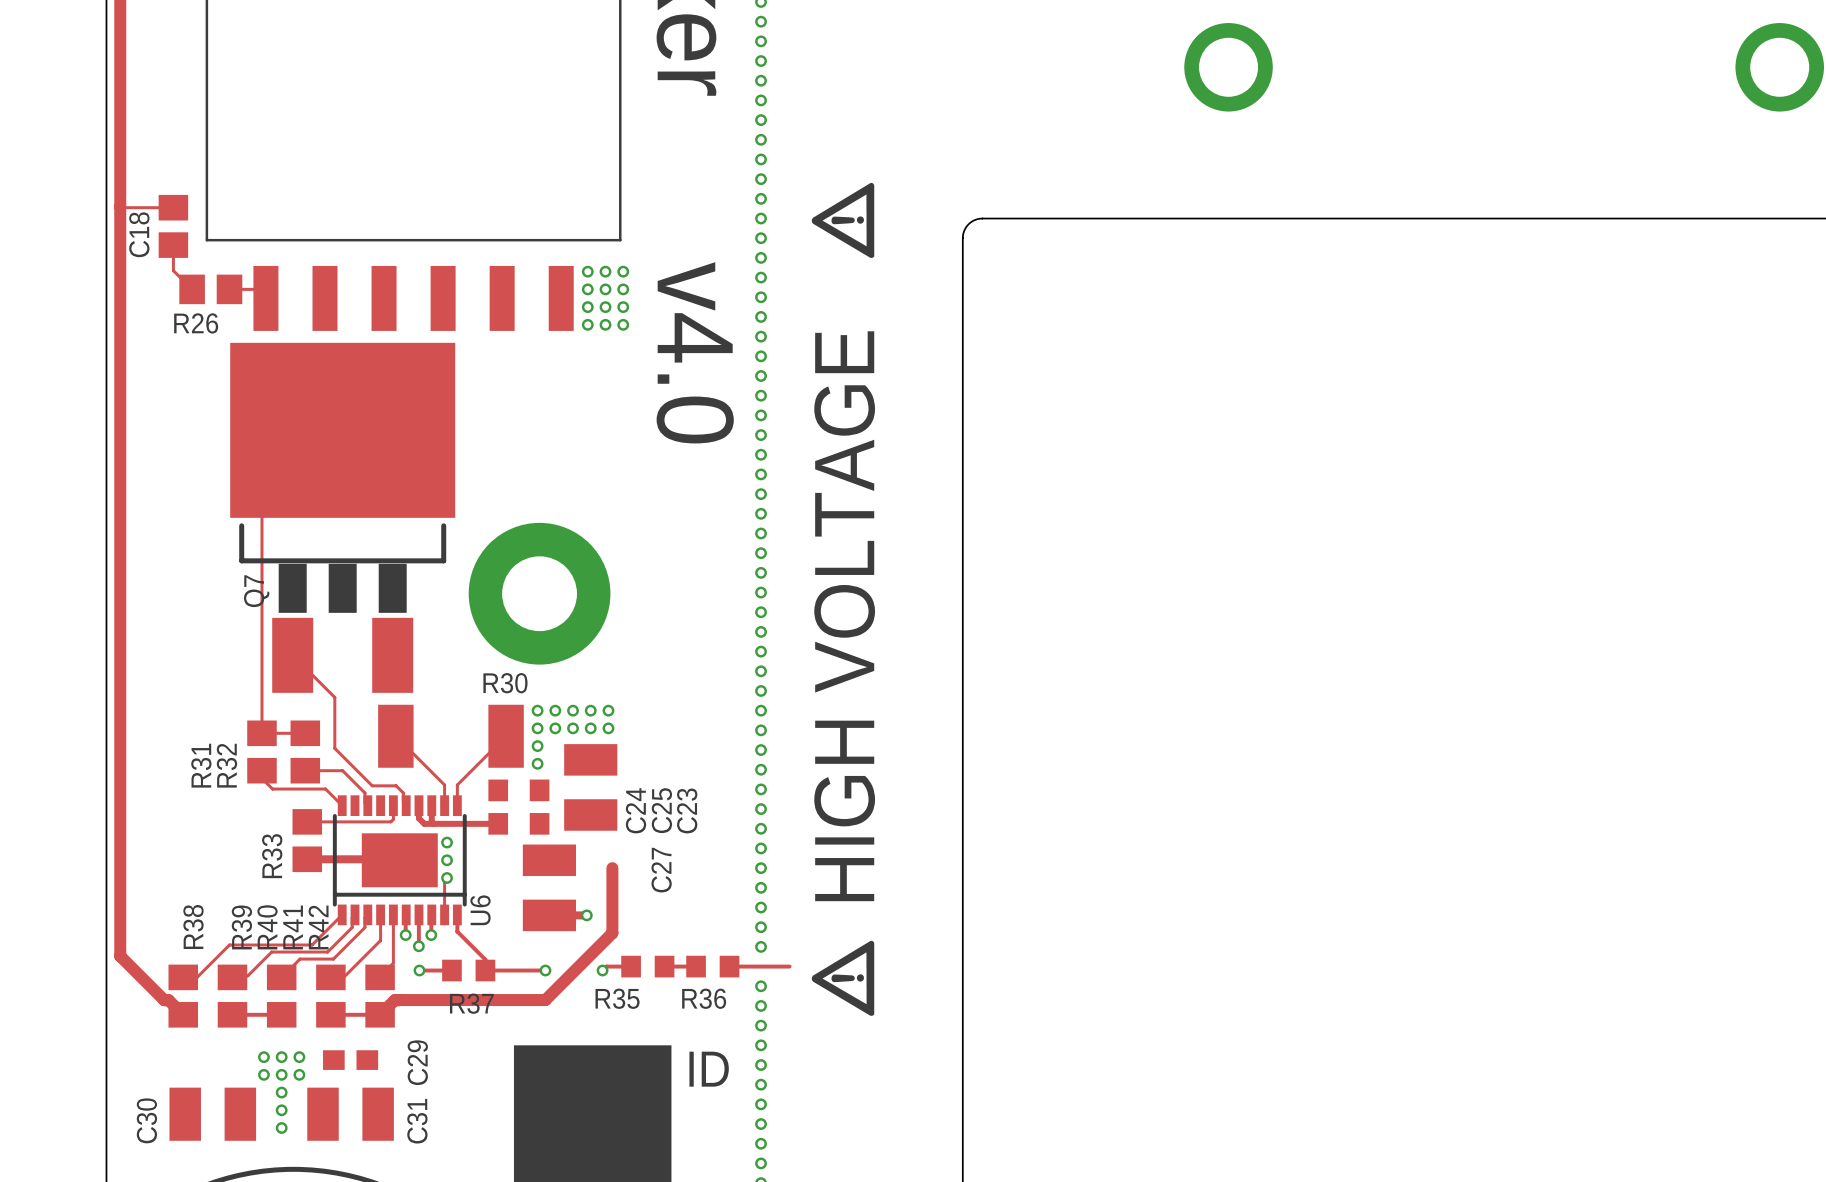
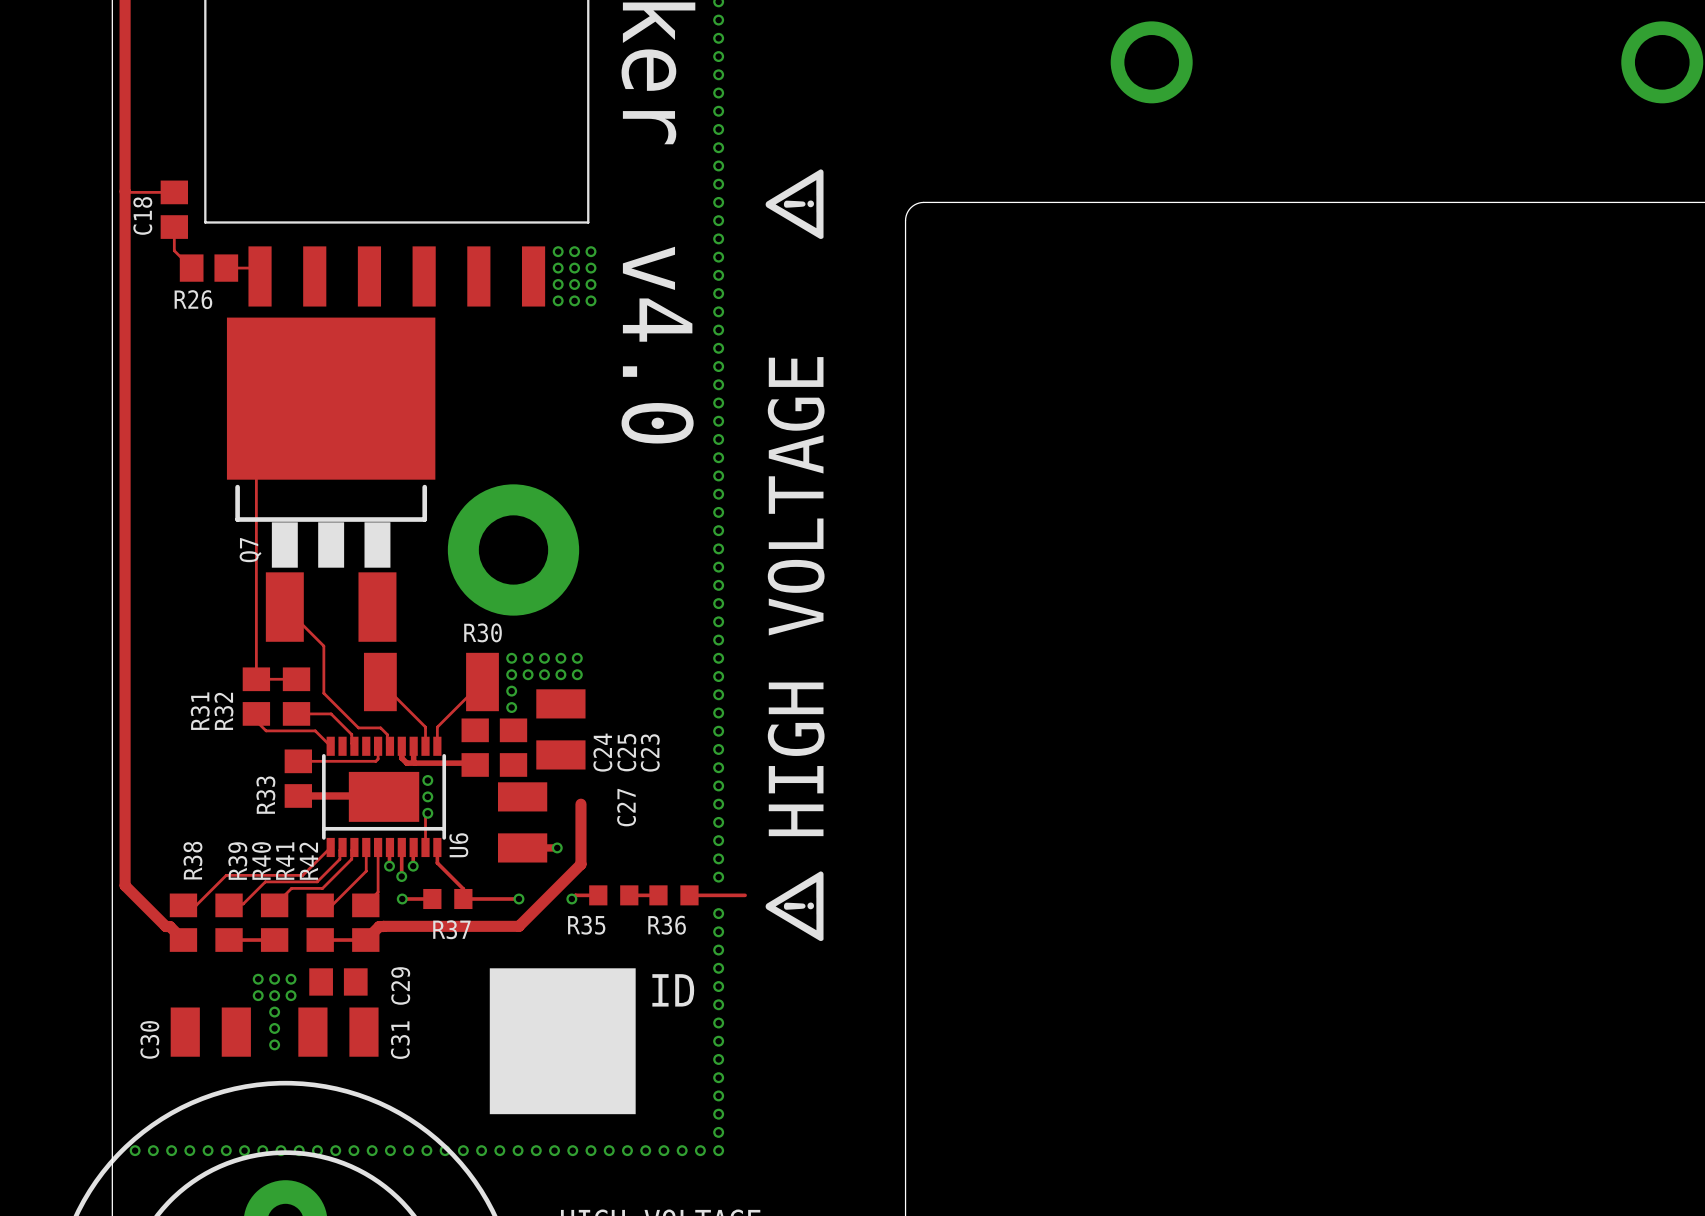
C24 footprint: [488, 779, 509, 835] -> [461, 718, 489, 777]
C25 footprint: [529, 779, 550, 835] -> [499, 718, 528, 777]
C29 footprint: [323, 1050, 379, 1070] -> [309, 968, 368, 996]

